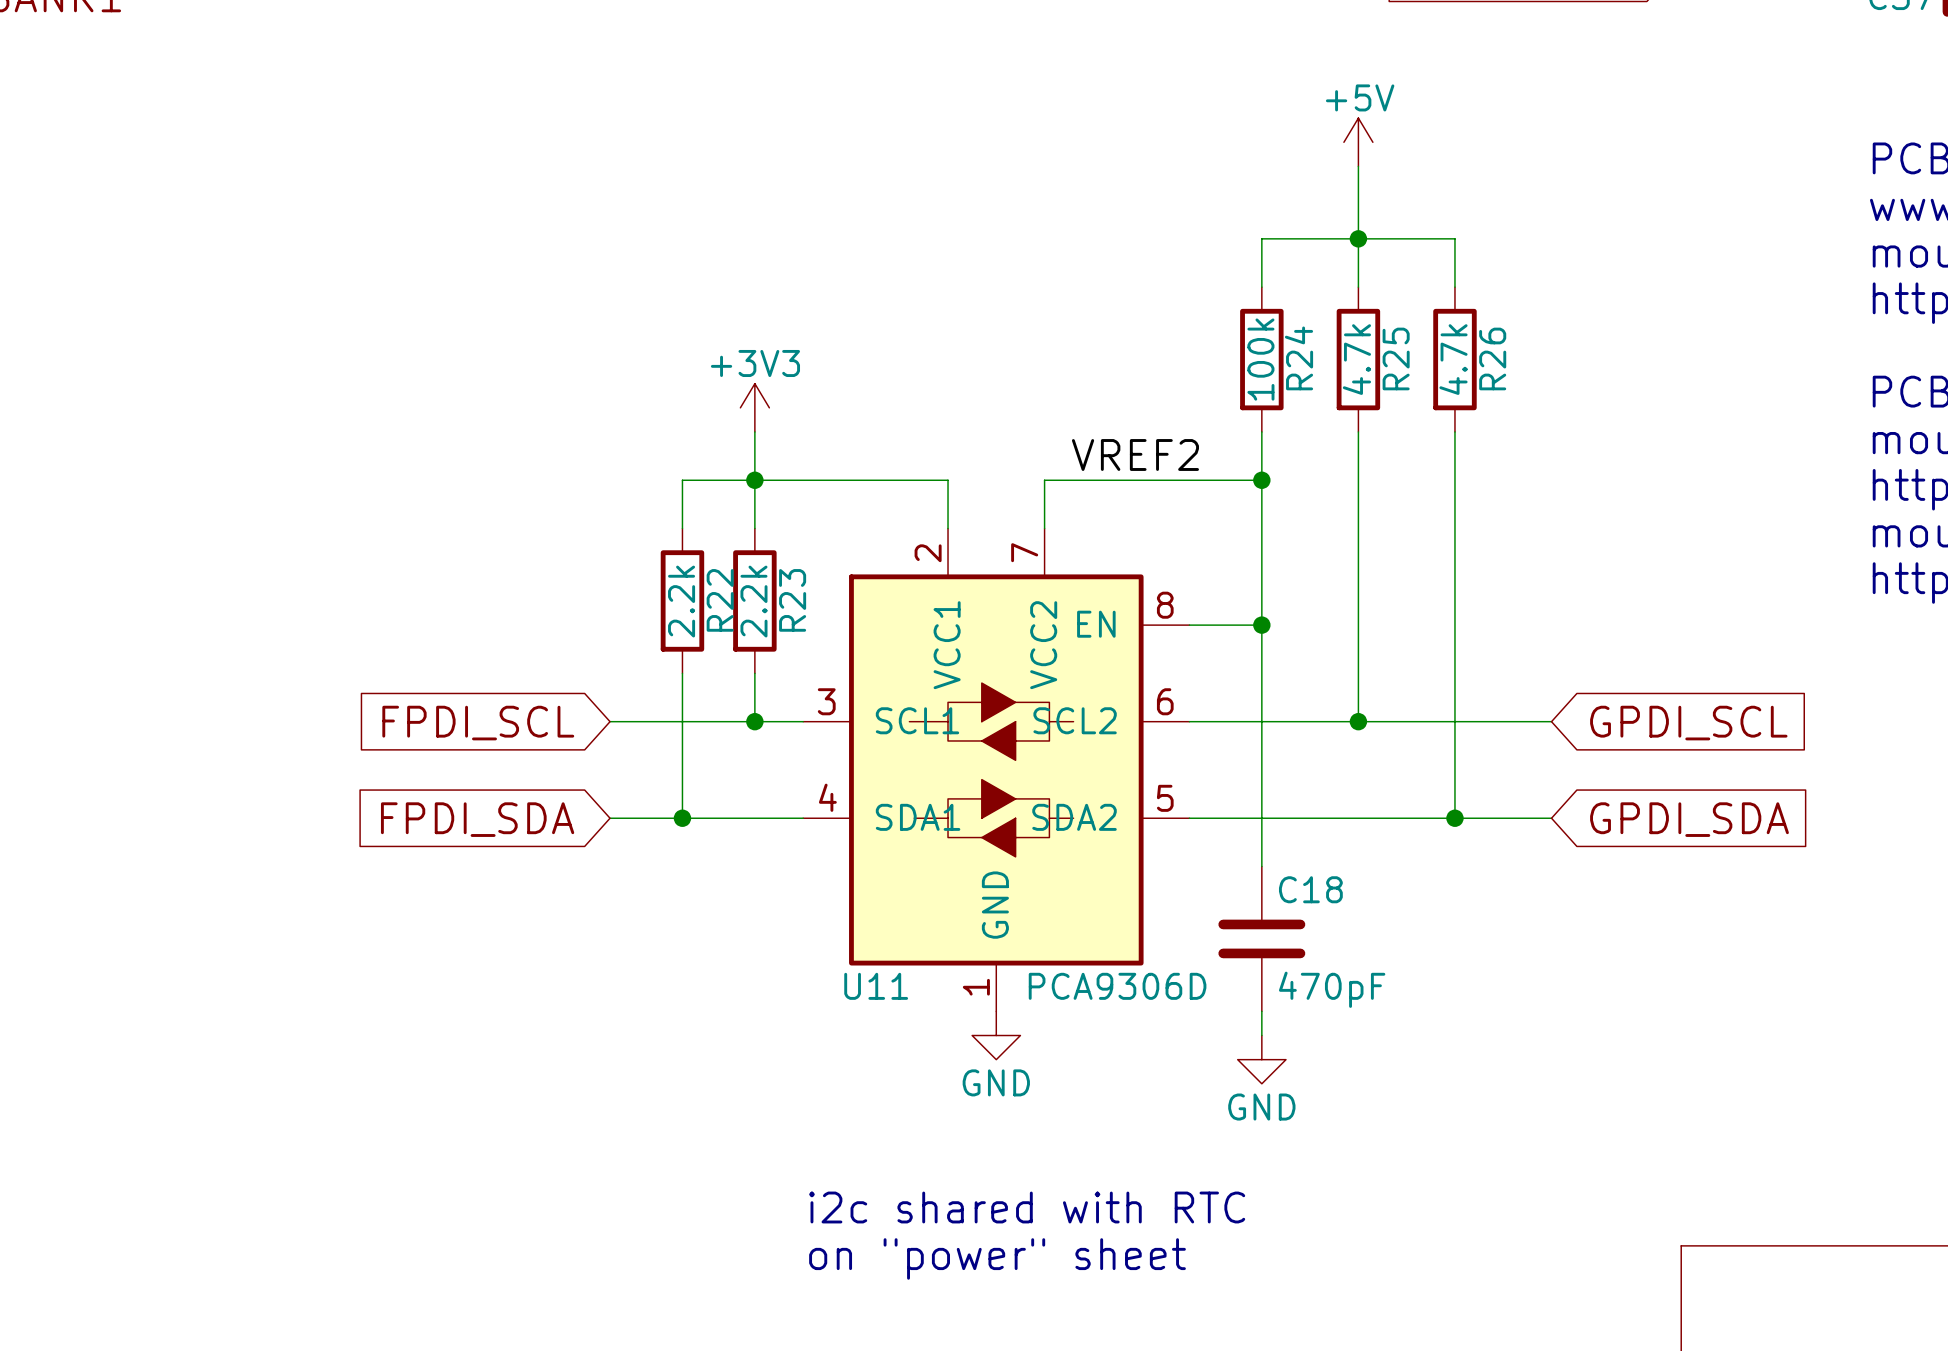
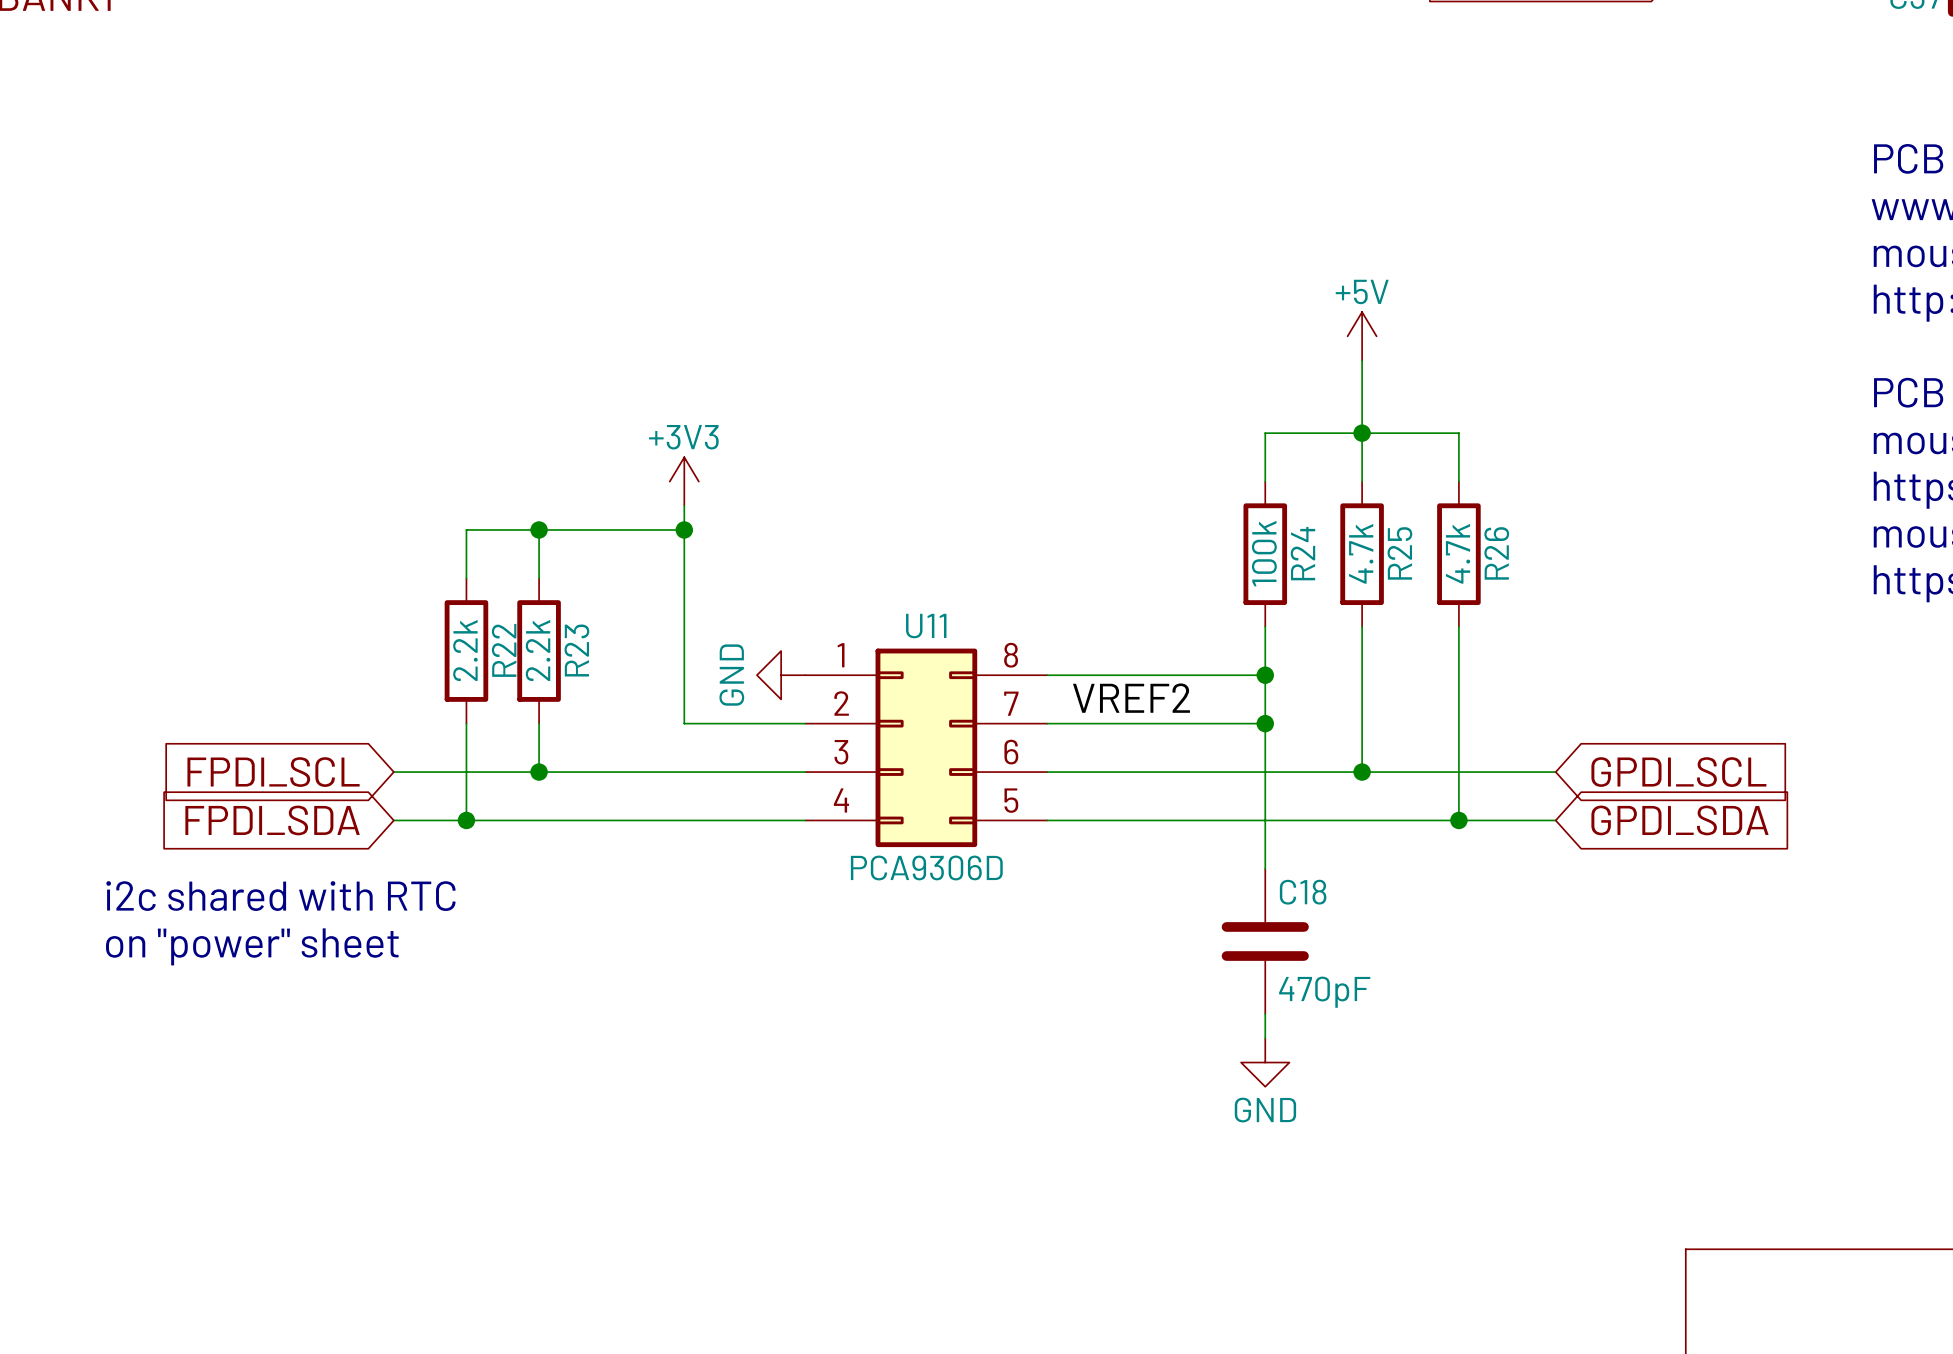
power symbol position: +5V (1358, 142) -> +5V (1362, 336)
wire: (1358, 166) (1358, 287) -> none
junction: (1358, 238) -> none
wire: (1261, 287) (1261, 238) (1454, 238) (1454, 287) -> none
R24 position: (1261, 359) -> (1265, 554)
wire: none -> (1362, 360) (1362, 433)
R25 position: (1358, 359) -> (1362, 554)
R26 position: (1454, 359) -> (1458, 554)
power symbol position: +3V3 (754, 407) -> +3V3 (684, 481)
wire: (754, 431) (754, 528) -> (466, 723) (466, 820)
wire: none -> (1265, 433) (1458, 433)
junction: none -> (1362, 433)
label position: VREF2 (1135, 454) -> VREF2 (1131, 698)
junction position: (754, 480) -> (684, 529)
junction: (1261, 480) -> none
wire: (1358, 480) (1358, 625) -> none
wire: (1454, 480) (1454, 625) -> none
wire: (682, 504) (682, 480) (948, 480) (948, 528) -> none
wire: none -> (539, 529) (539, 578)
junction: none -> (539, 529)
U11 symbol: [803, 528, 1190, 1012] -> [805, 648, 1048, 848]
wire: (1044, 528) (1044, 480) (1261, 480) (1261, 625) (1189, 625) -> none
wire: none -> (466, 578) (466, 529) (684, 529) (684, 675)
R22 position: (682, 600) -> (466, 651)
R23 position: (754, 600) -> (539, 651)
junction: (1261, 625) -> none
wire: (754, 673) (754, 721) -> (539, 723) (539, 772)
wire: none -> (1047, 675) (1265, 675)
junction: none -> (1265, 675)
wire: (610, 721) (682, 721) (682, 818) -> none
junction: (754, 721) -> none
wire: (1261, 721) (1551, 721) -> none
junction: none -> (1265, 723)
wire: none -> (1362, 723) (1362, 772)
junction: (1358, 721) -> none
global label position: FPDI_SCL (478, 723) -> FPDI_SCL (273, 772)
global label position: GPDI_SCL (1688, 723) -> GPDI_SCL (1678, 772)
wire: none -> (393, 772) (805, 772)
junction: none -> (539, 772)
wire: none -> (1047, 772) (1555, 772)
junction: none -> (1362, 772)
wire: none -> (393, 820) (611, 820)
junction: none -> (466, 820)
junction: (682, 818) -> none
global label position: FPDI_SDA (477, 819) -> FPDI_SDA (272, 820)
text: none -> i2c shared with RTC (280, 896)
text: none -> on "power" sheet (252, 946)
U11 name position: U11 (876, 986) -> U11 (926, 626)
U11 value position: PCA9306D (1117, 986) -> PCA9306D (926, 867)
power symbol rotation: 0° (996, 1035) -> 90° clockwise (781, 675)
power symbol position: GND (996, 1035) -> GND (781, 675)
text: i2c shared with RTC (1027, 1207) -> none
text: on "power" sheet (997, 1258) -> none

